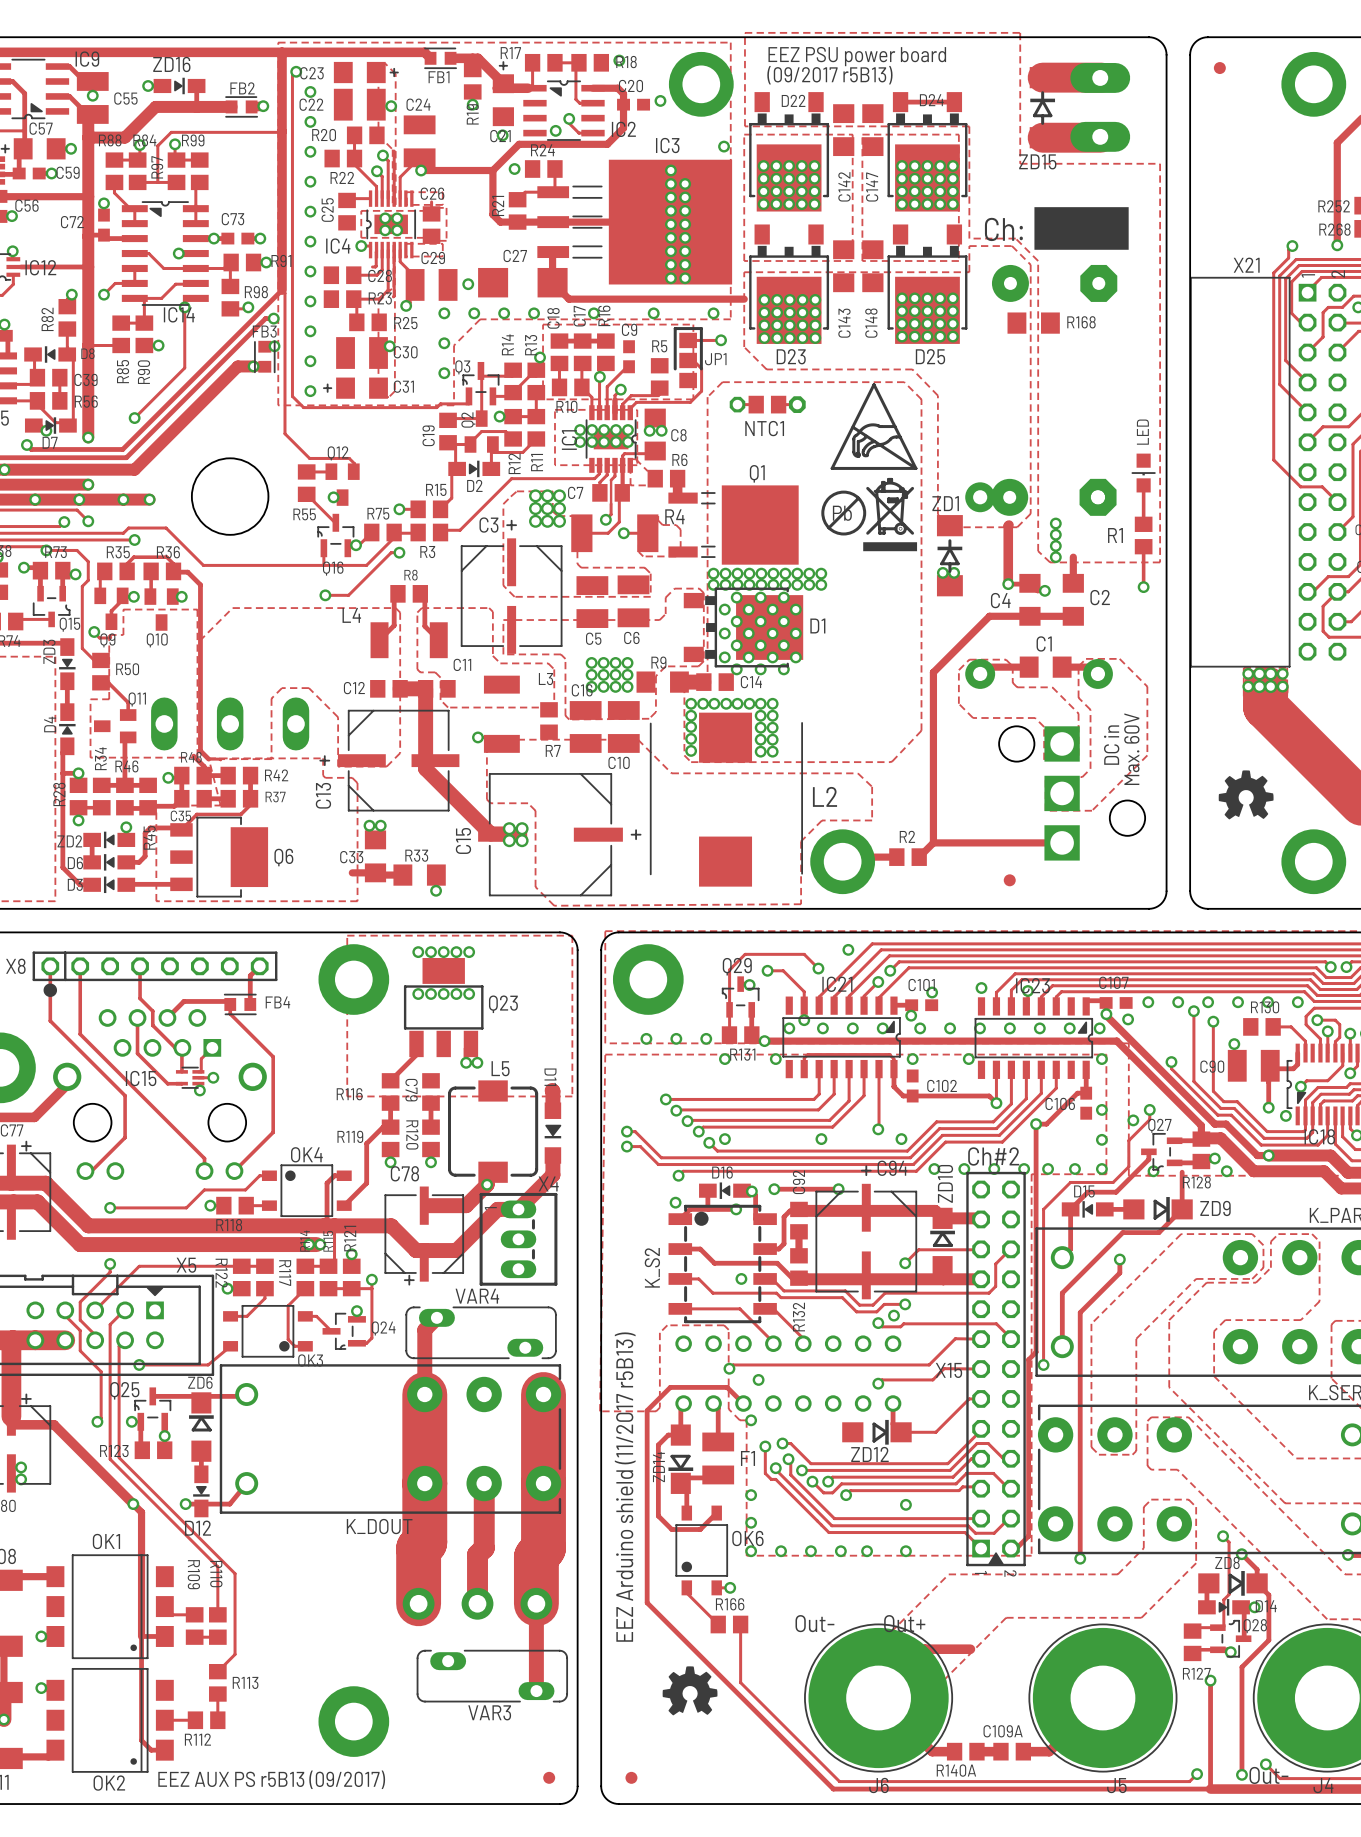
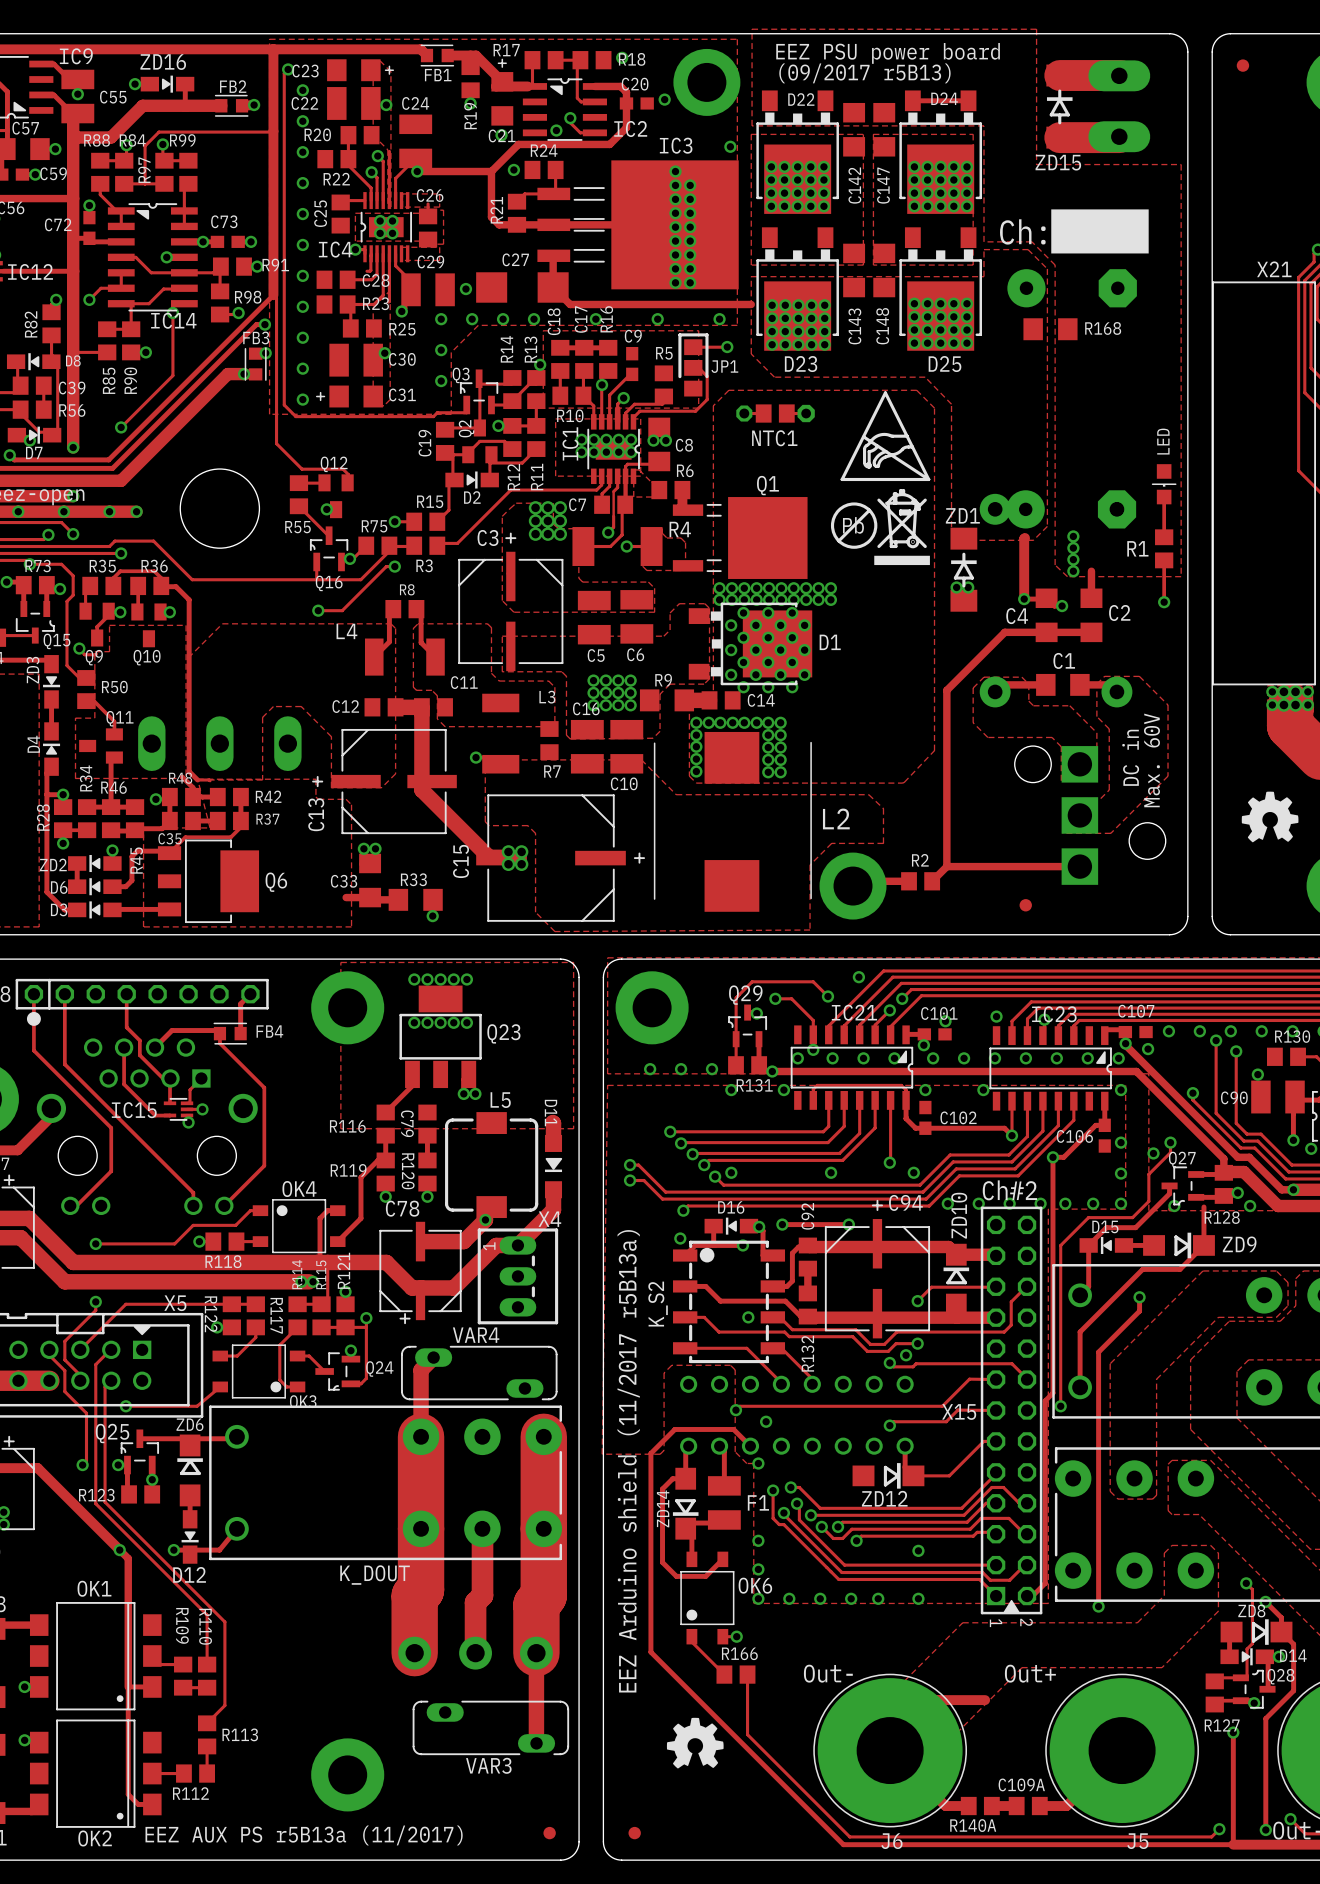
text: EEZ Arduino shield (11/2017 r5B13) (625, 1487) -> EEZ Arduino shield (11/2017 r5B13a) (628, 1461)
text: EEZ AUX PS r5B13 (09/2017) (271, 1779) -> EEZ AUX PS r5B13a (11/2017) (304, 1835)

